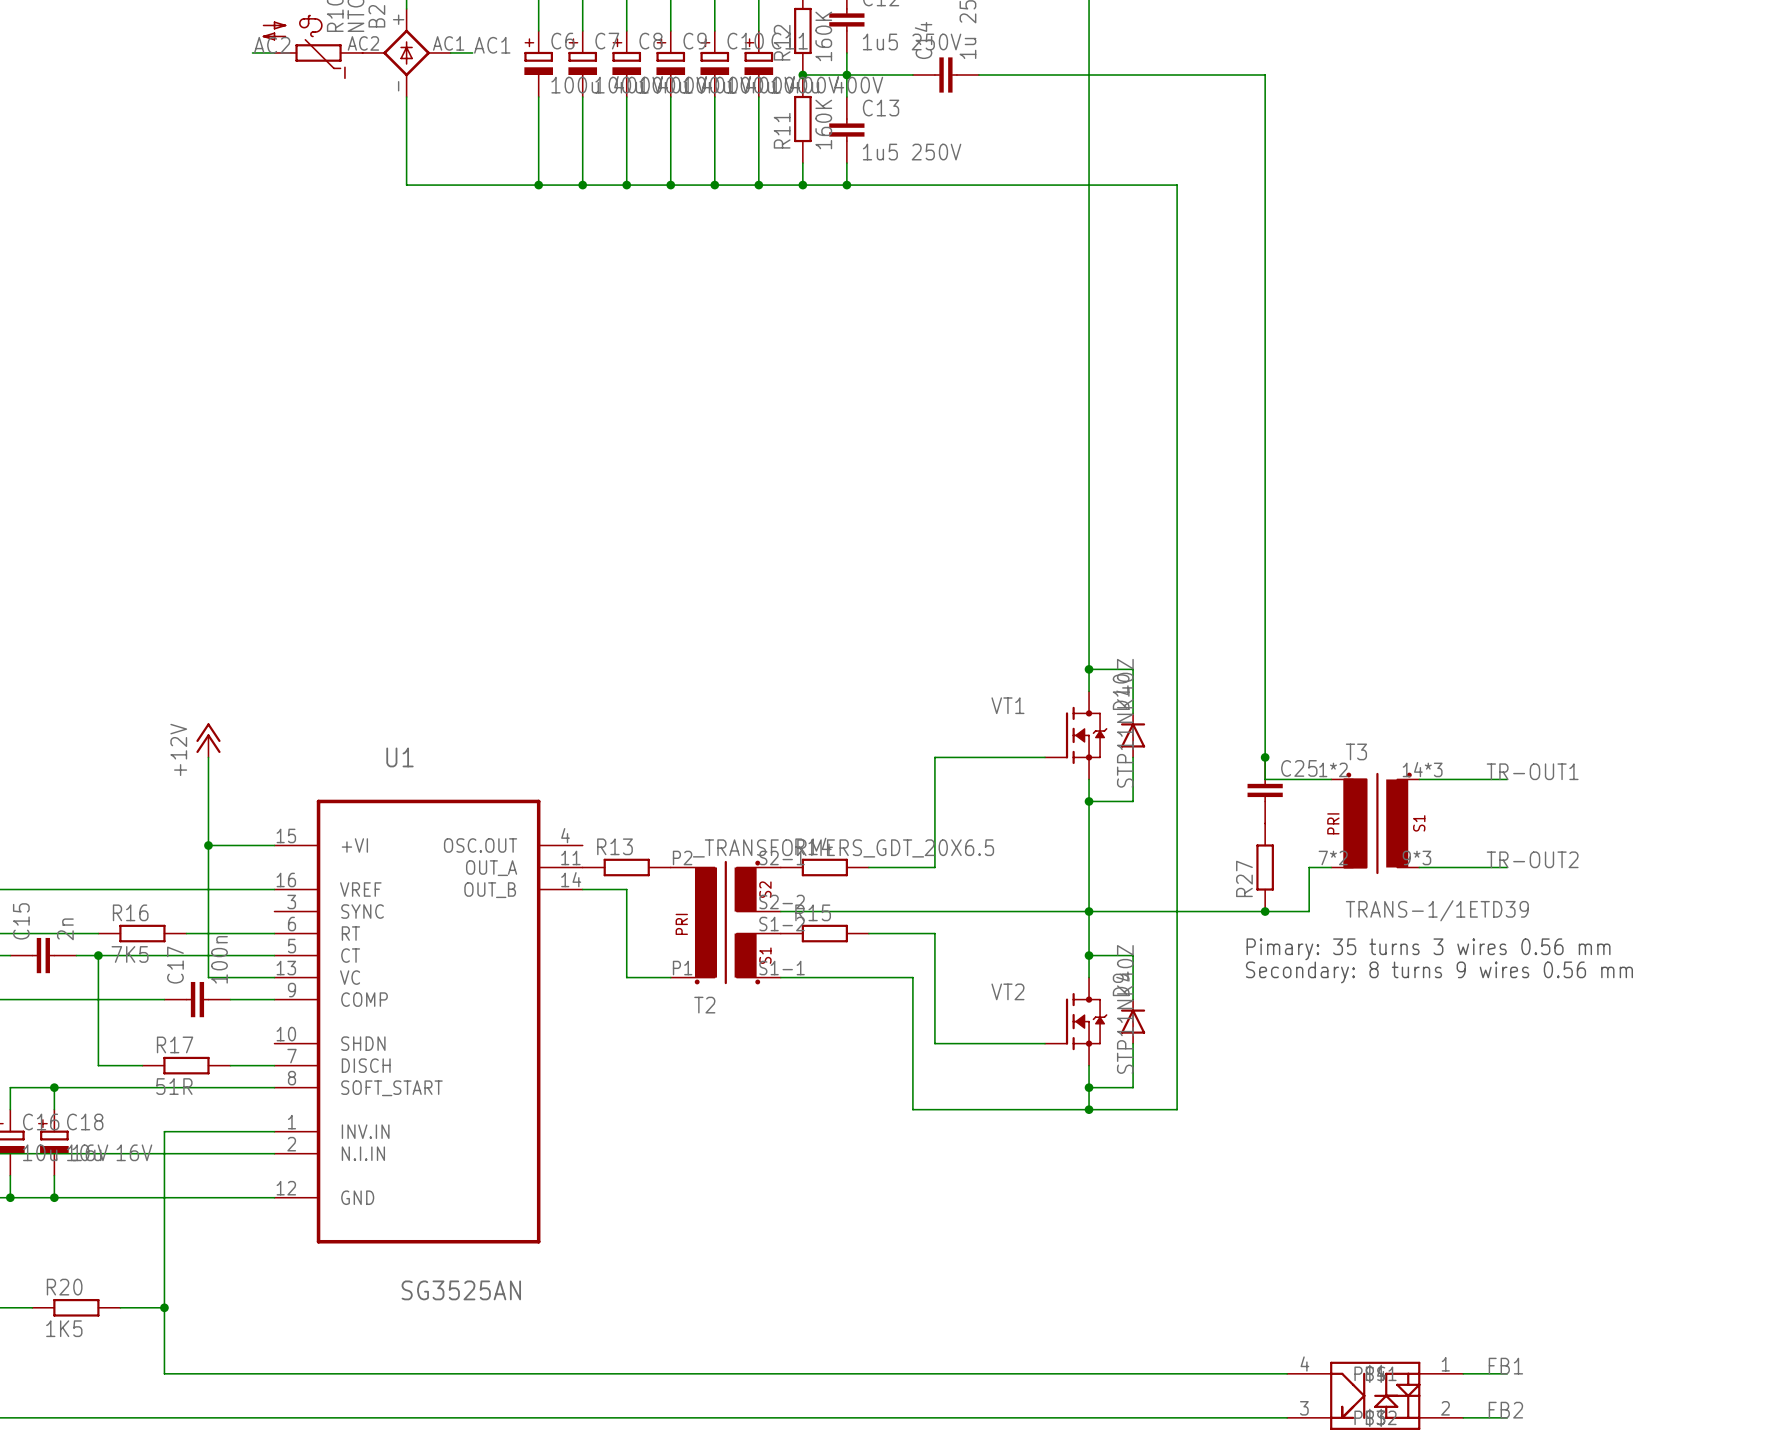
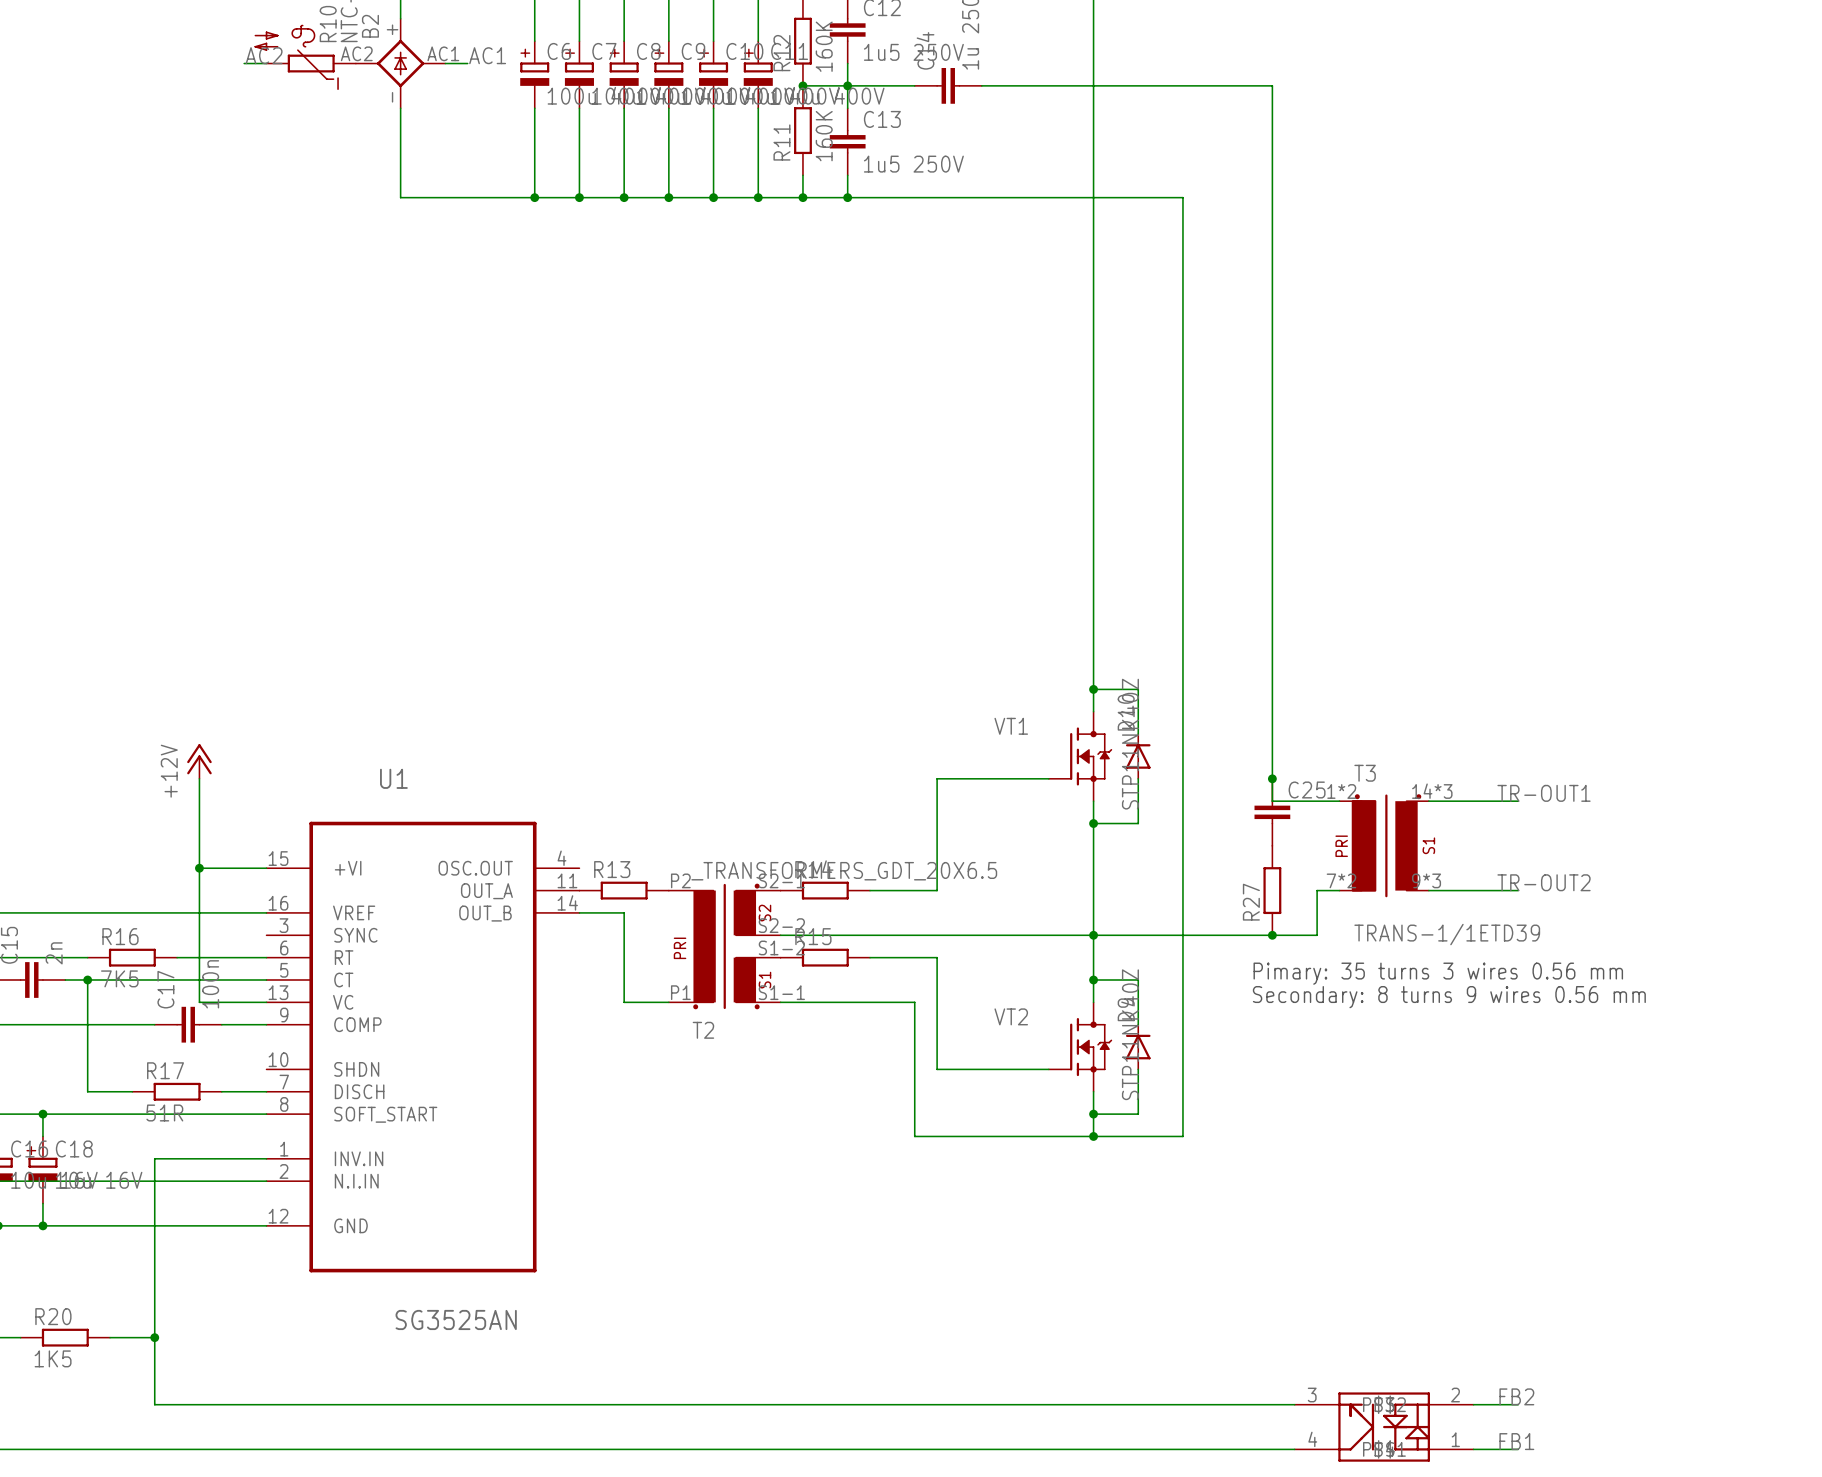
label: FB1 (1505, 1366) -> FB2 (1516, 1396)
part flip: as is (1375, 1395) -> up-down (1384, 1427)
label: FB2 (1505, 1410) -> FB1 (1516, 1441)

